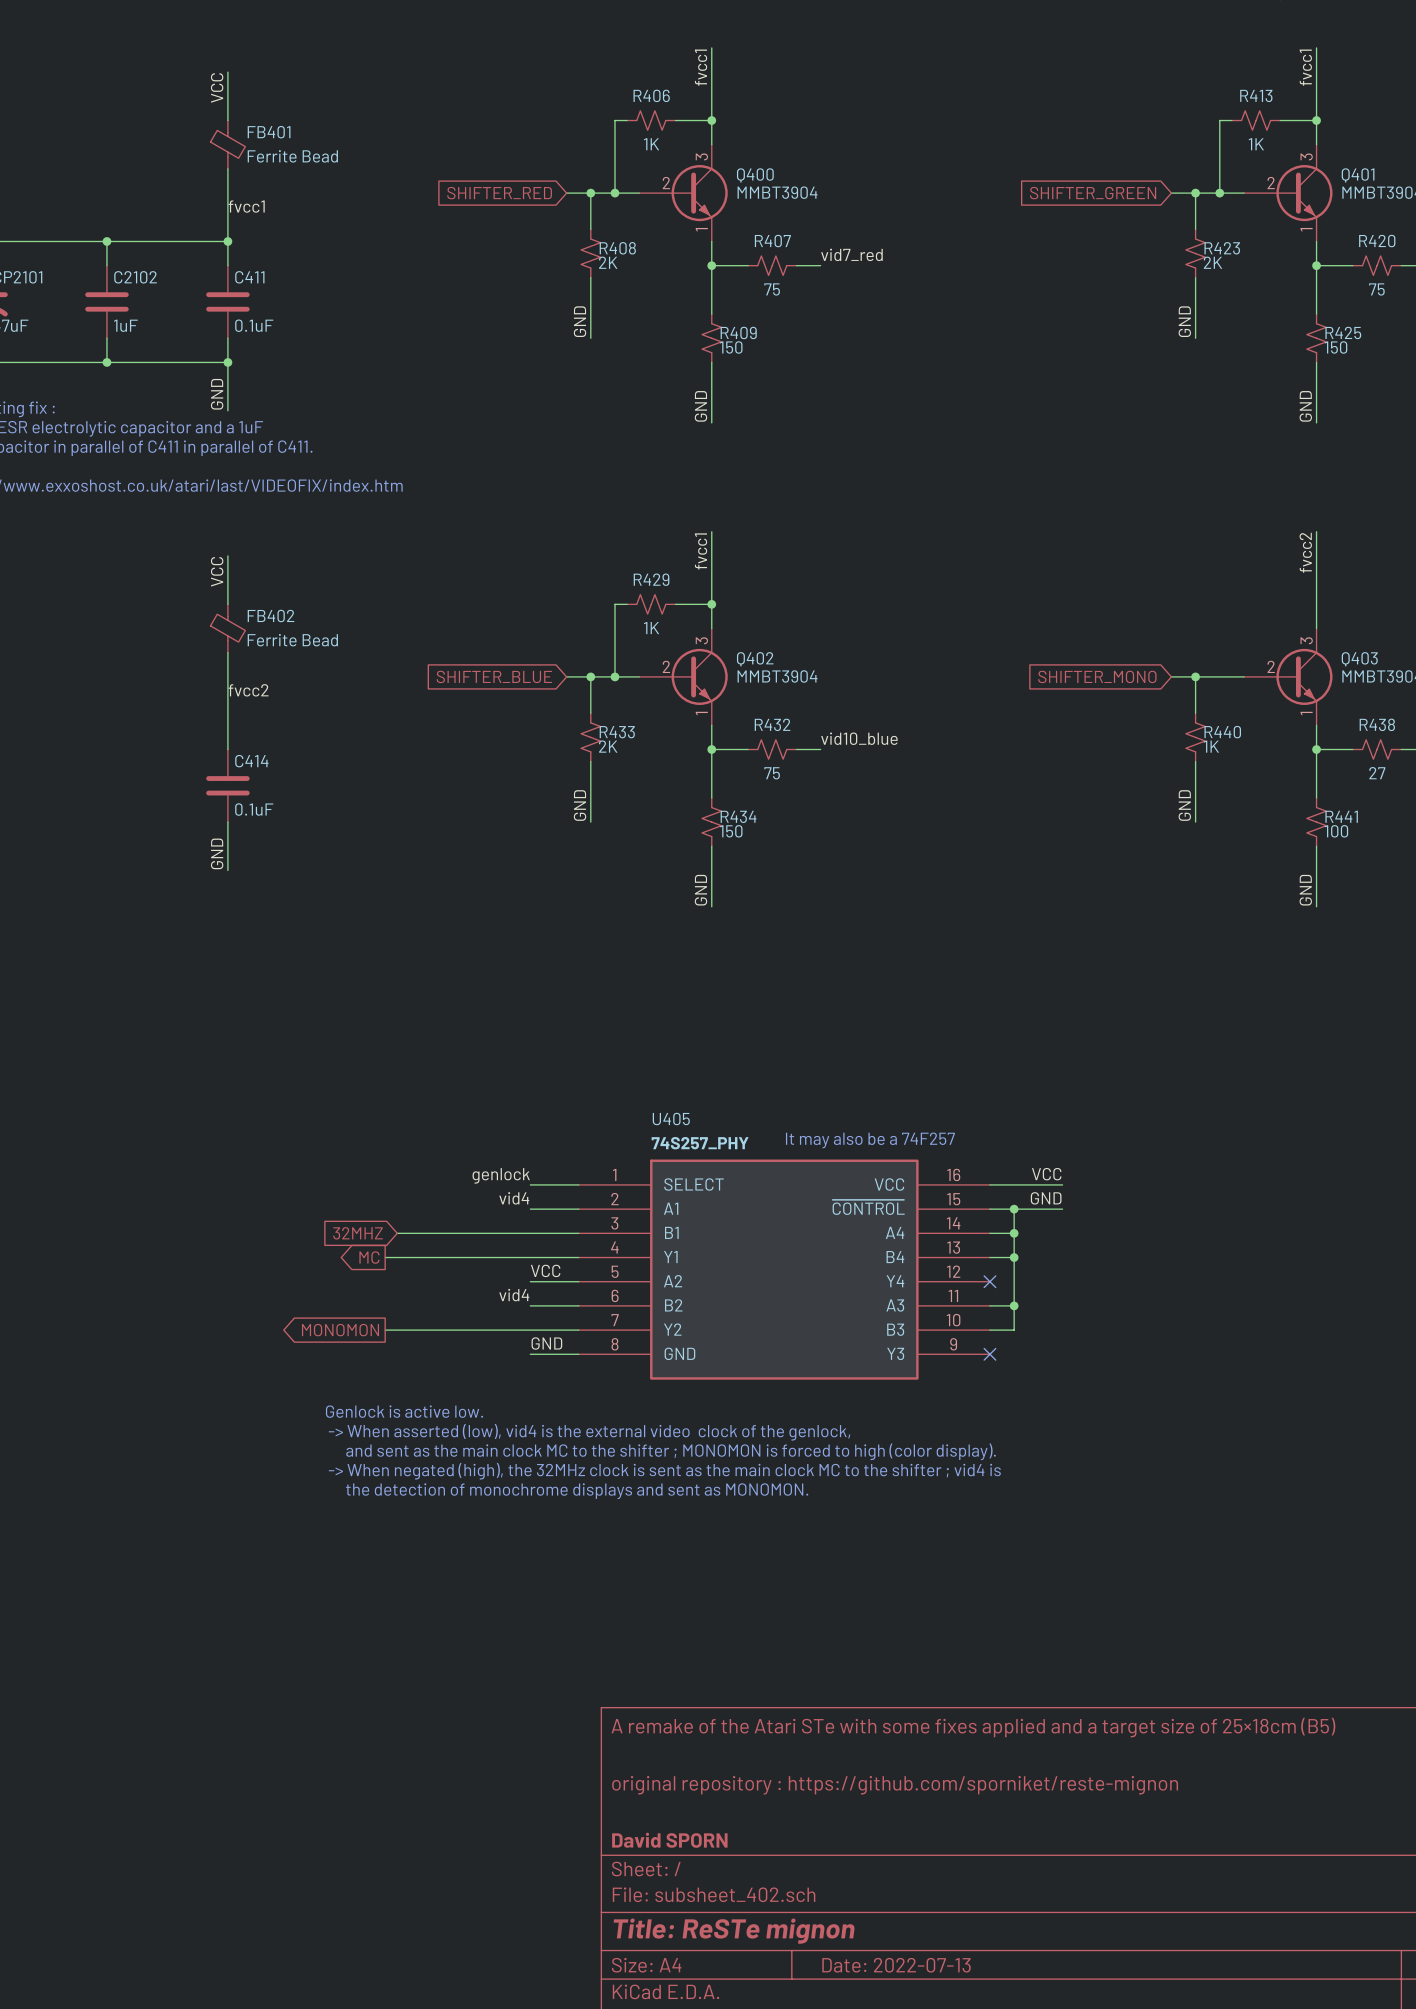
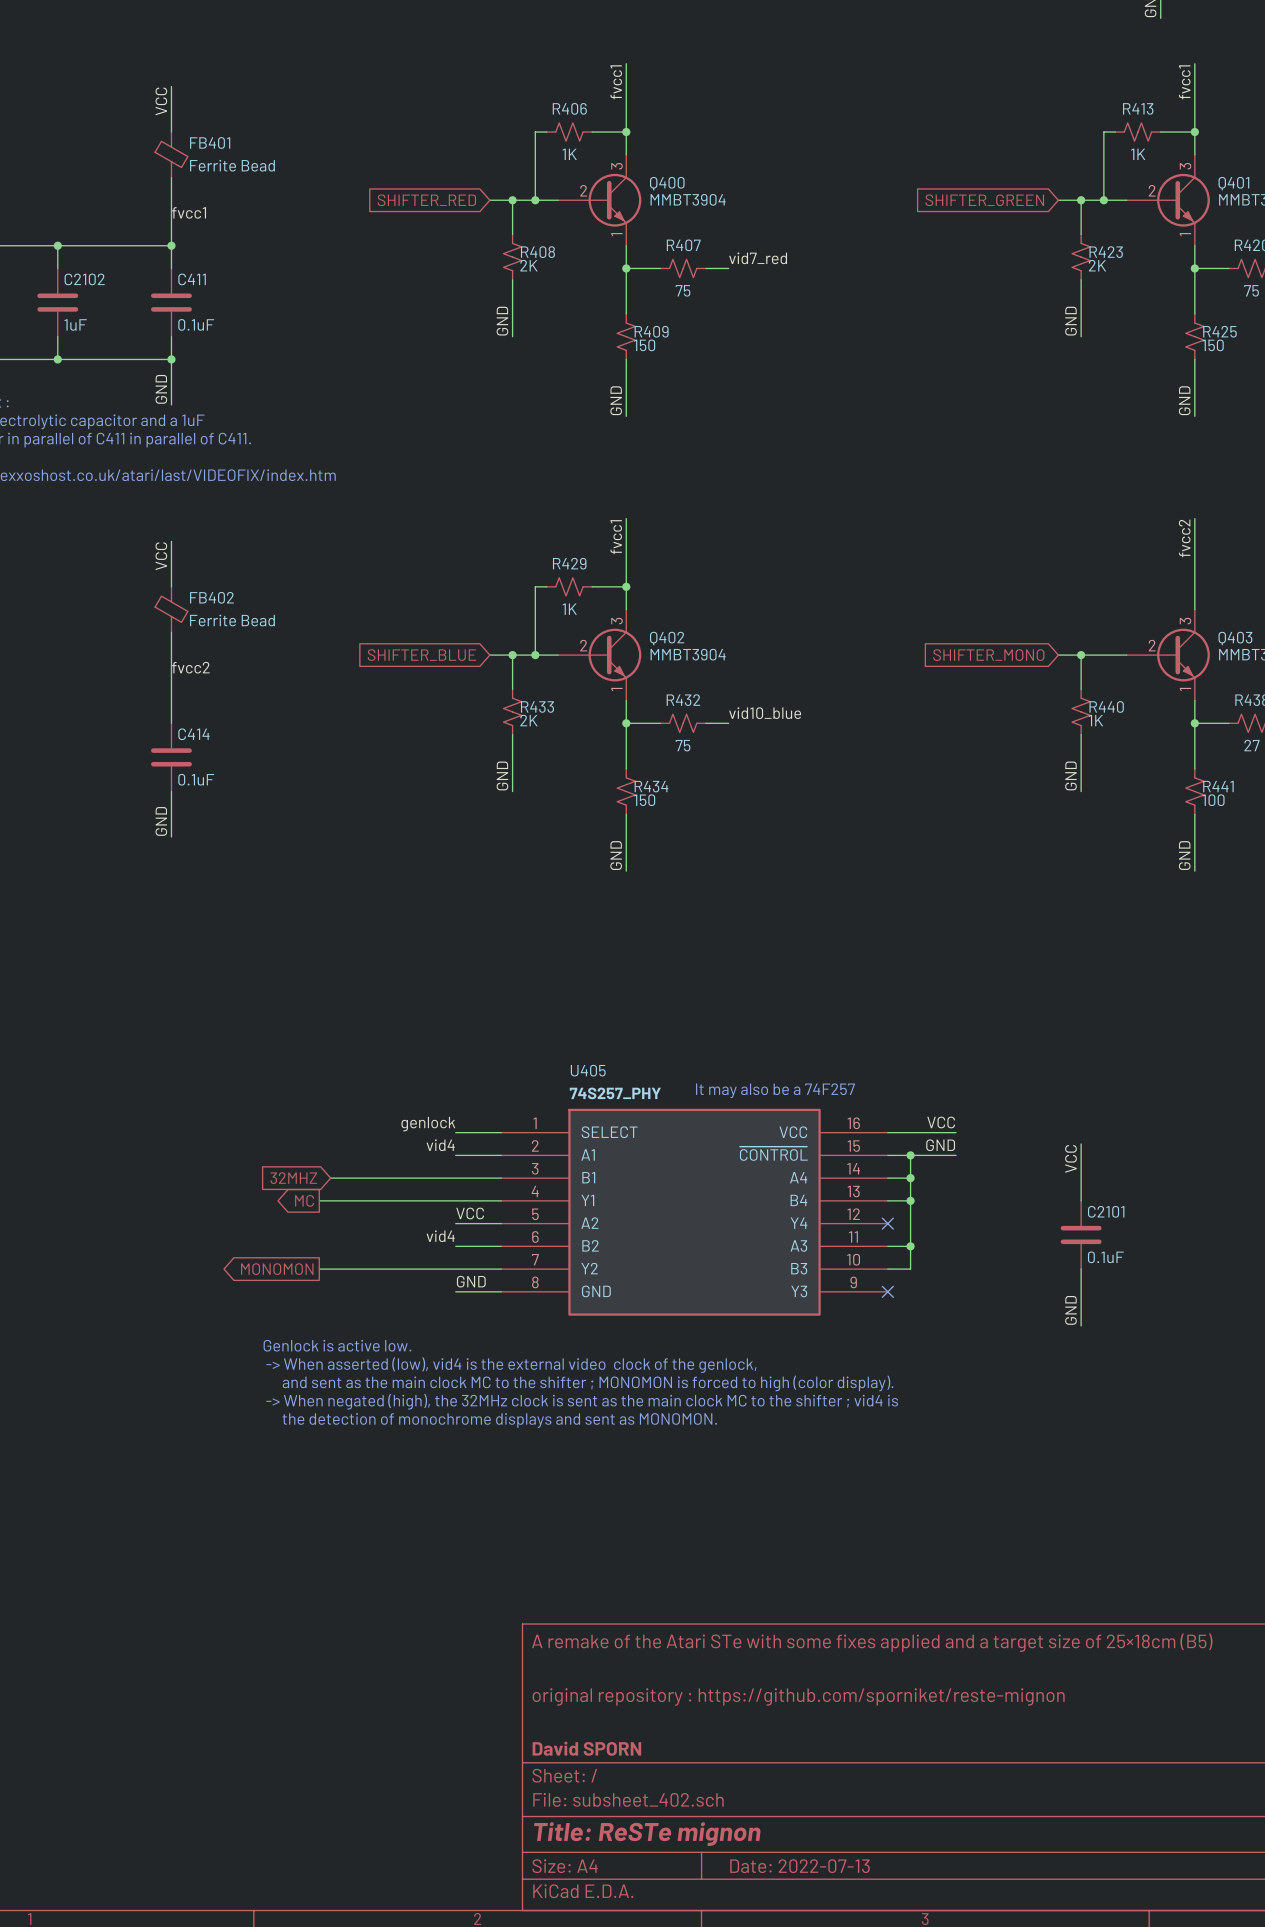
wire: none -> (1081, 1144) (1081, 1200)
label: none -> VCC (1070, 1158)
C2101: none -> 0.1uF (1081, 1234)
wire: none -> (1081, 1269) (1081, 1325)
label: none -> GND (1070, 1310)

